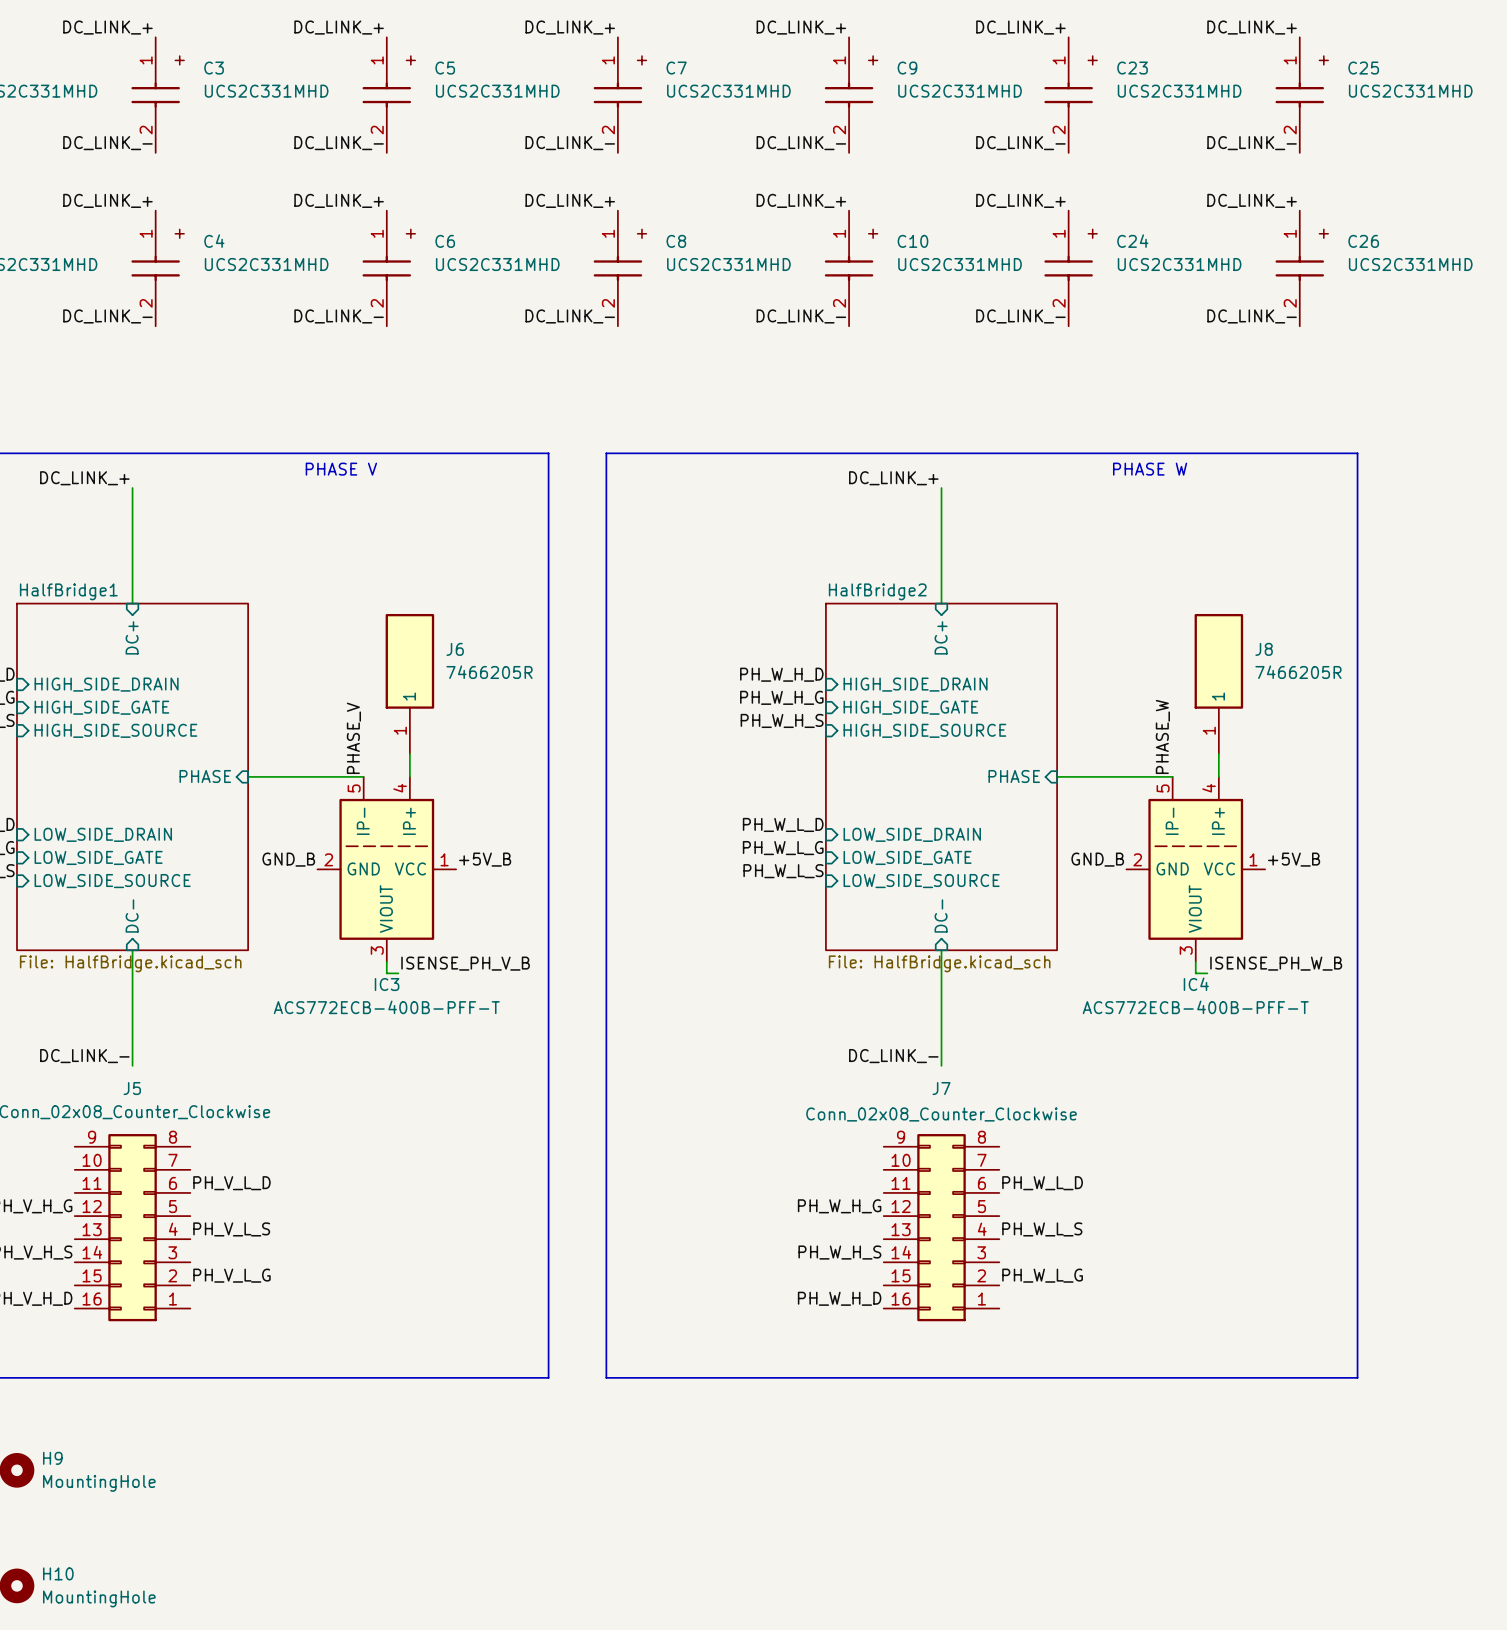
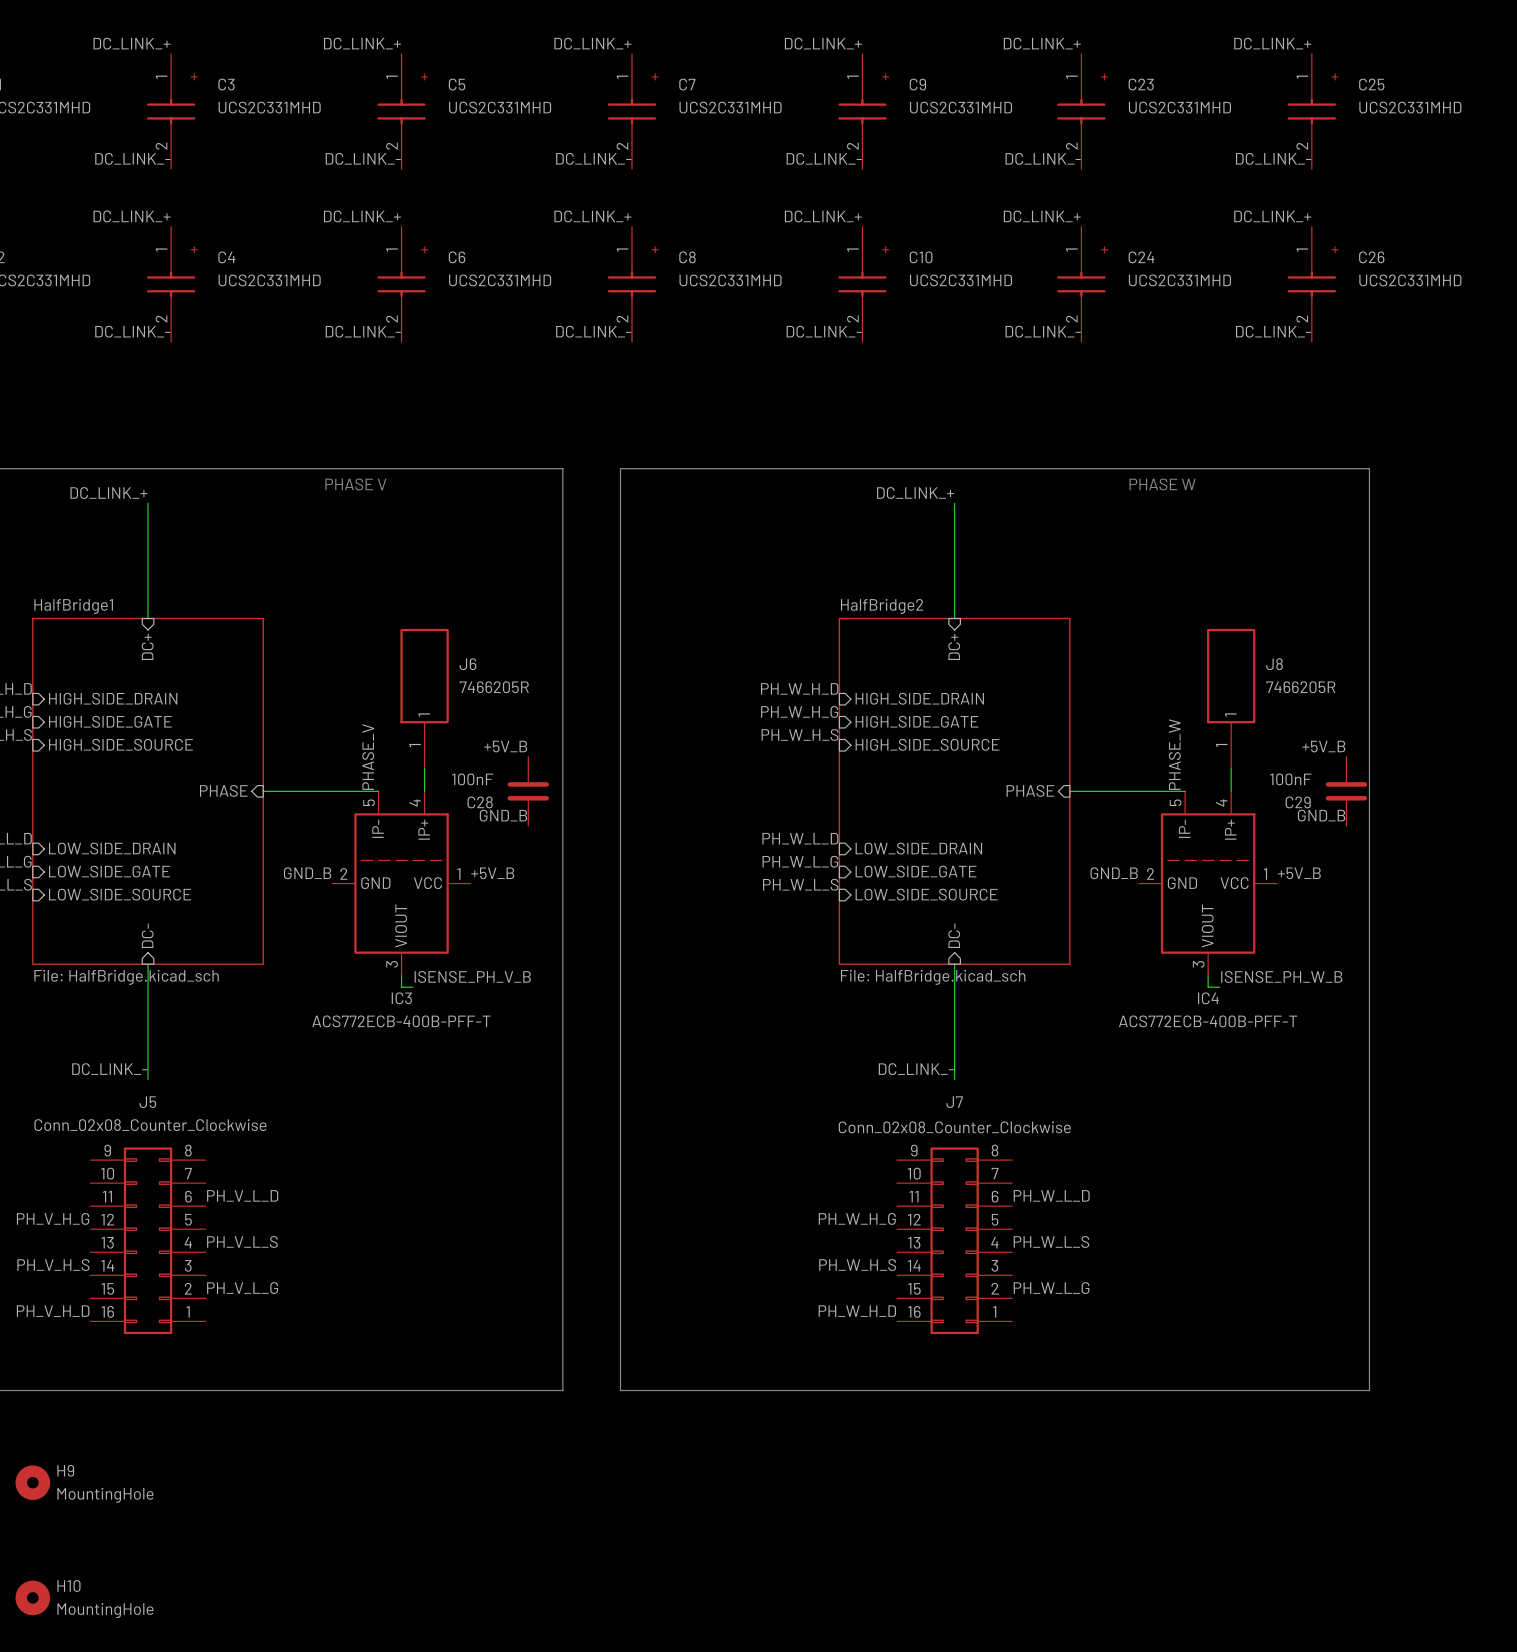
label: none -> +5V_B (505, 746)
label: none -> +5V_B (1323, 746)
C28: none -> 100nF (528, 791)
C29: none -> 100nF (1346, 791)
label: none -> GND_B (503, 815)
label: none -> GND_B (1321, 815)

